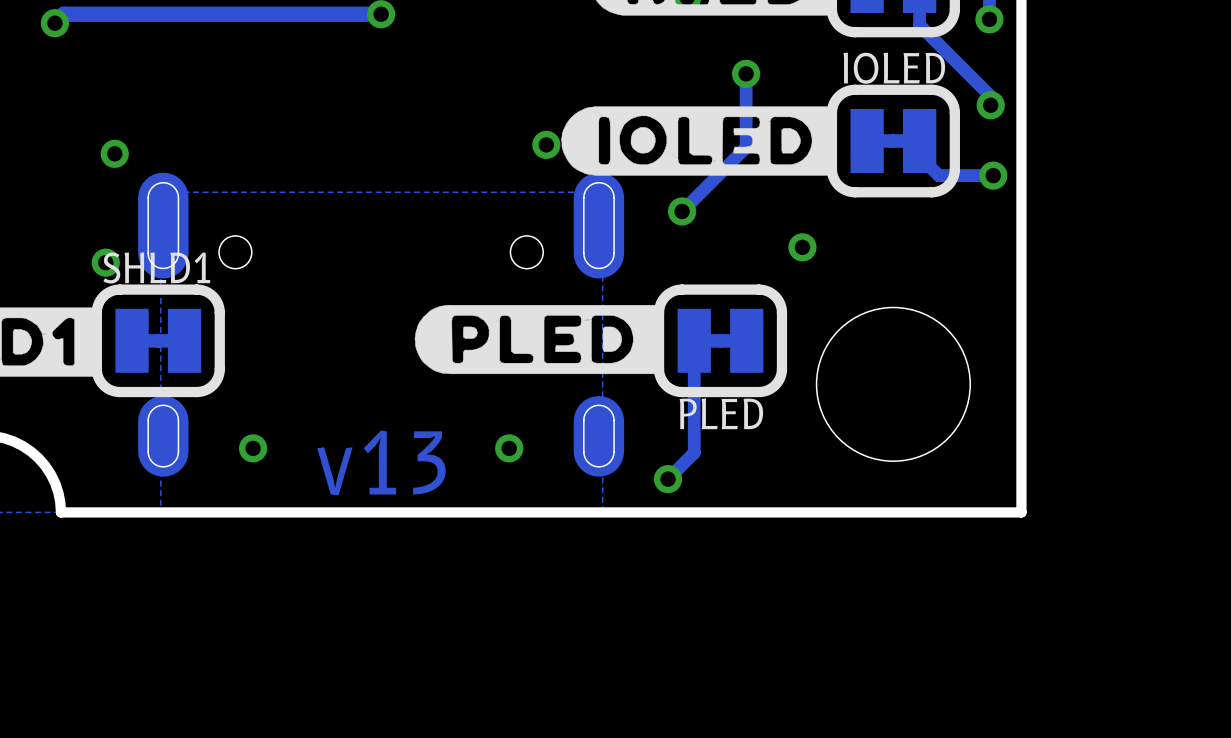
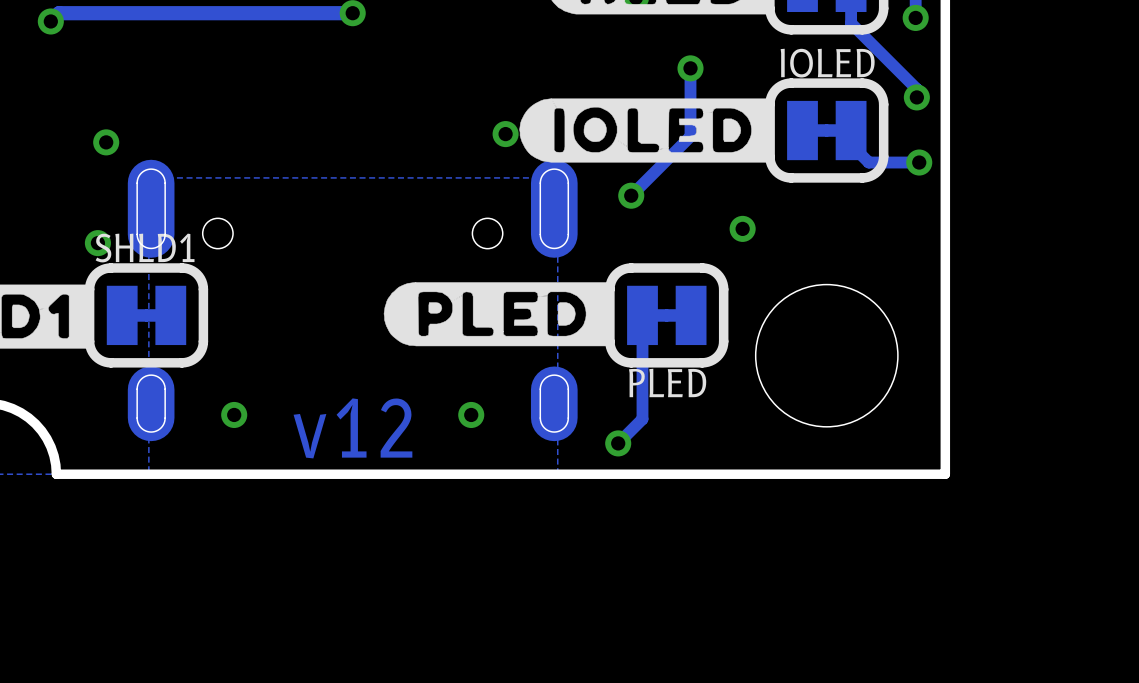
text: v13 (381, 462) -> v12 (352, 428)

